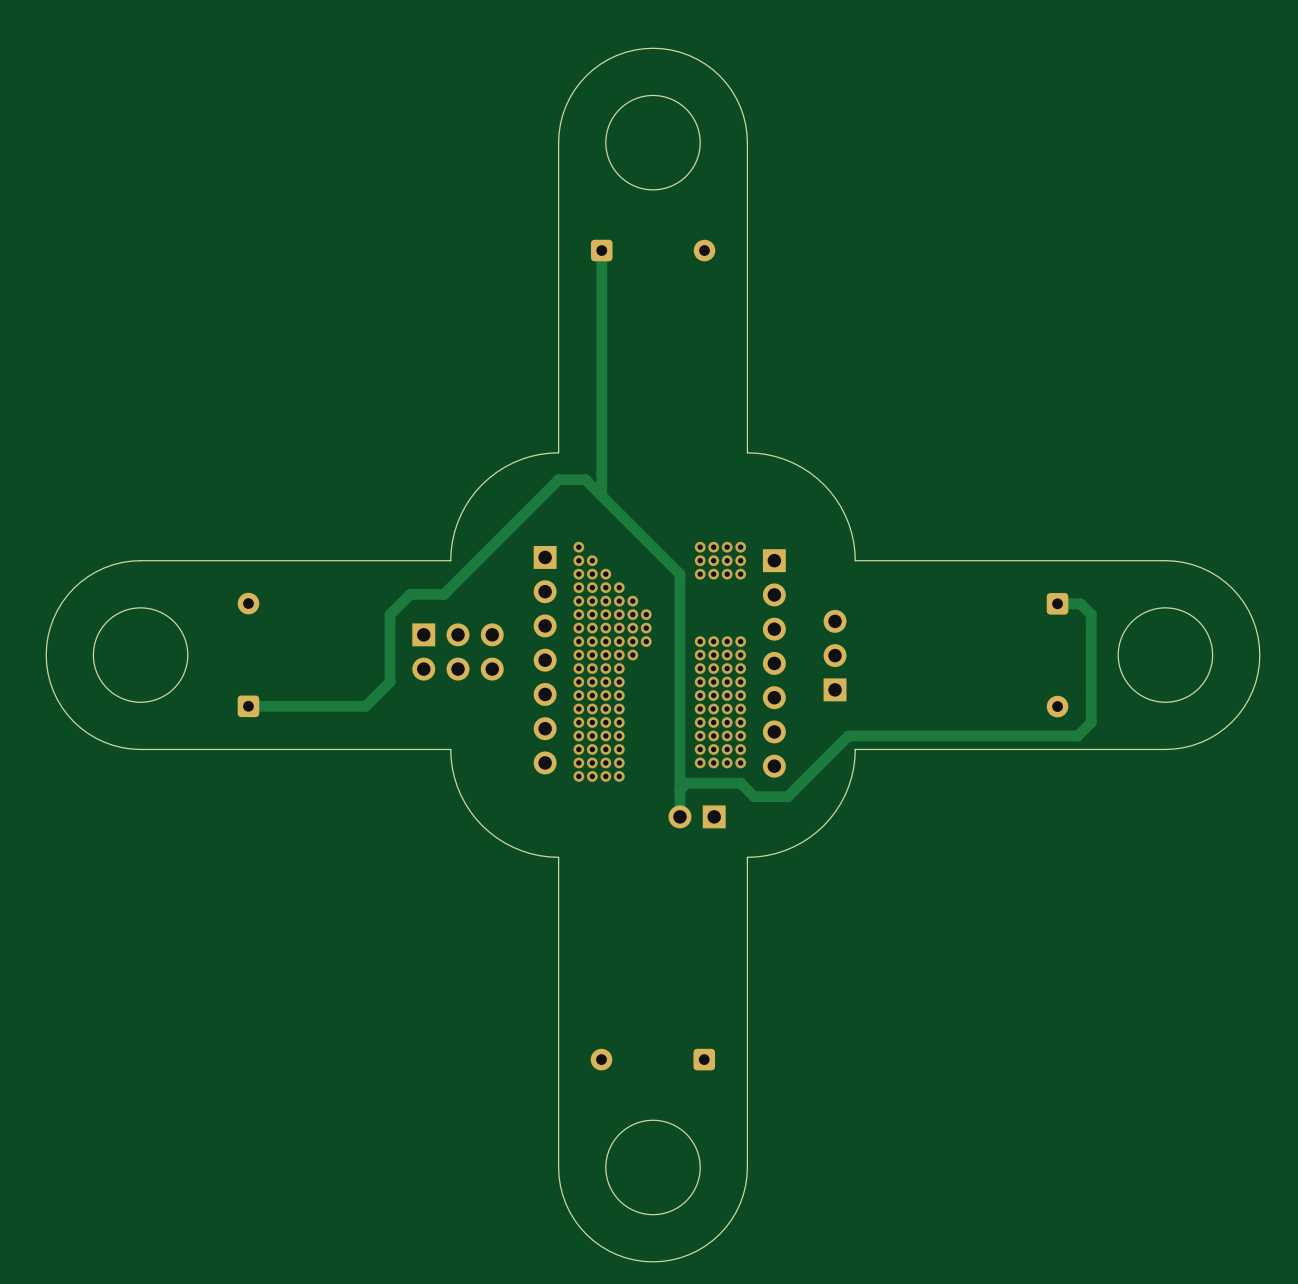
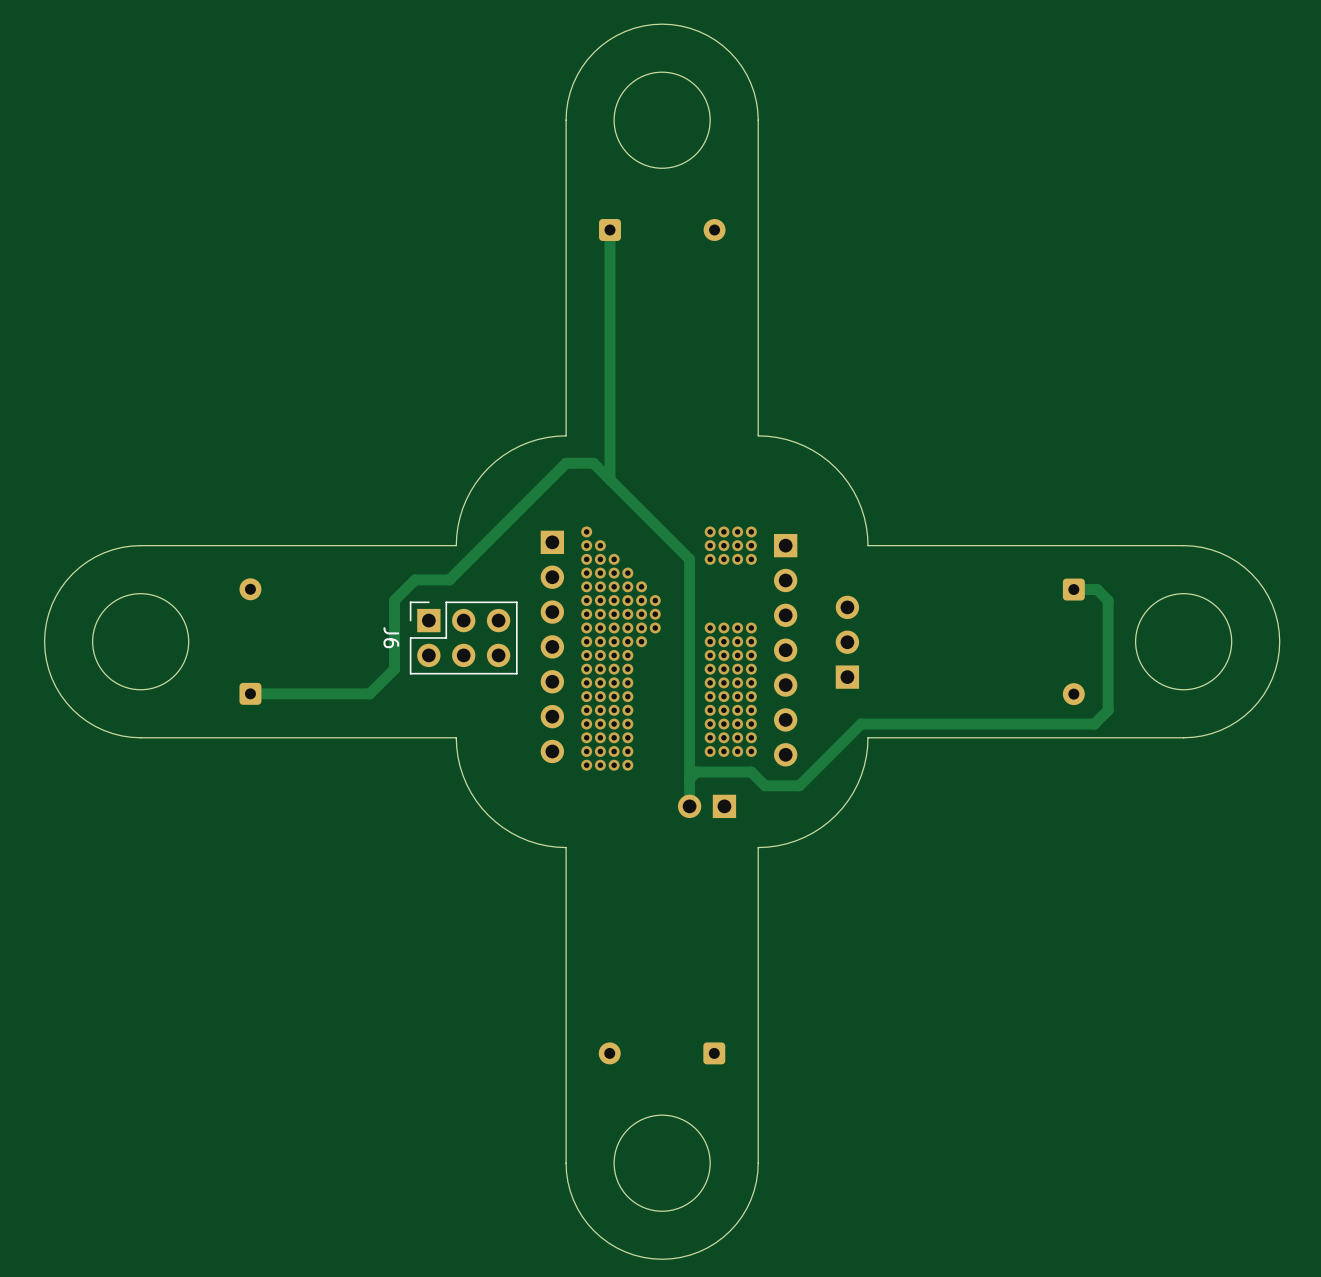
part: (458, 651) -> none
J6: none -> (463, 638)

